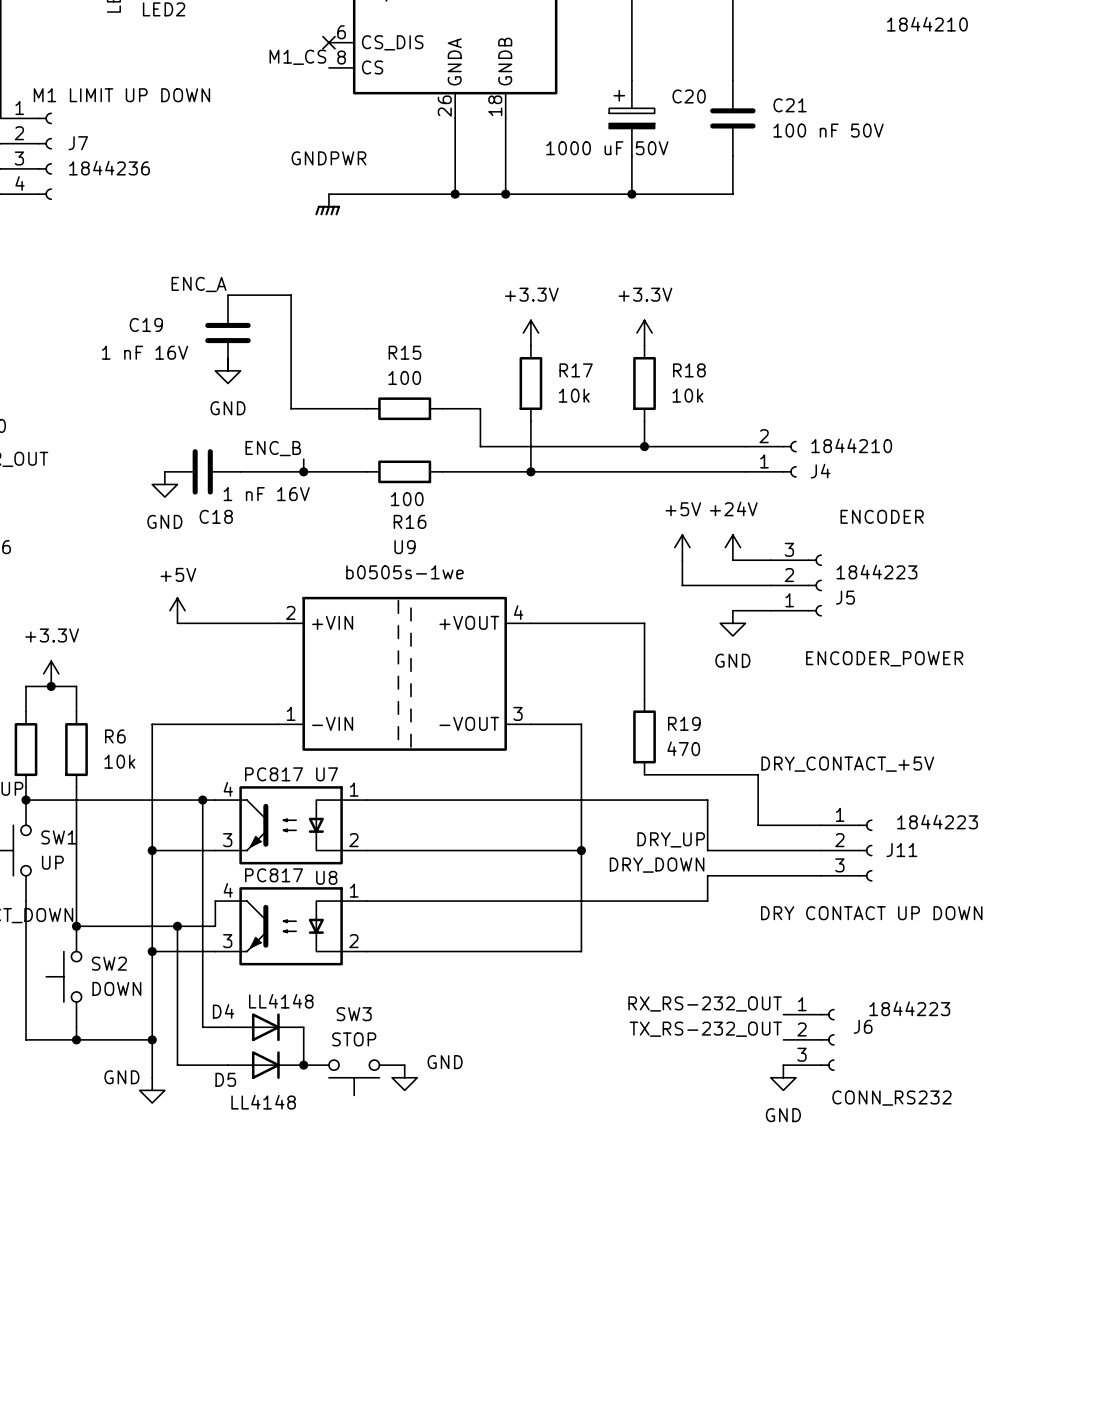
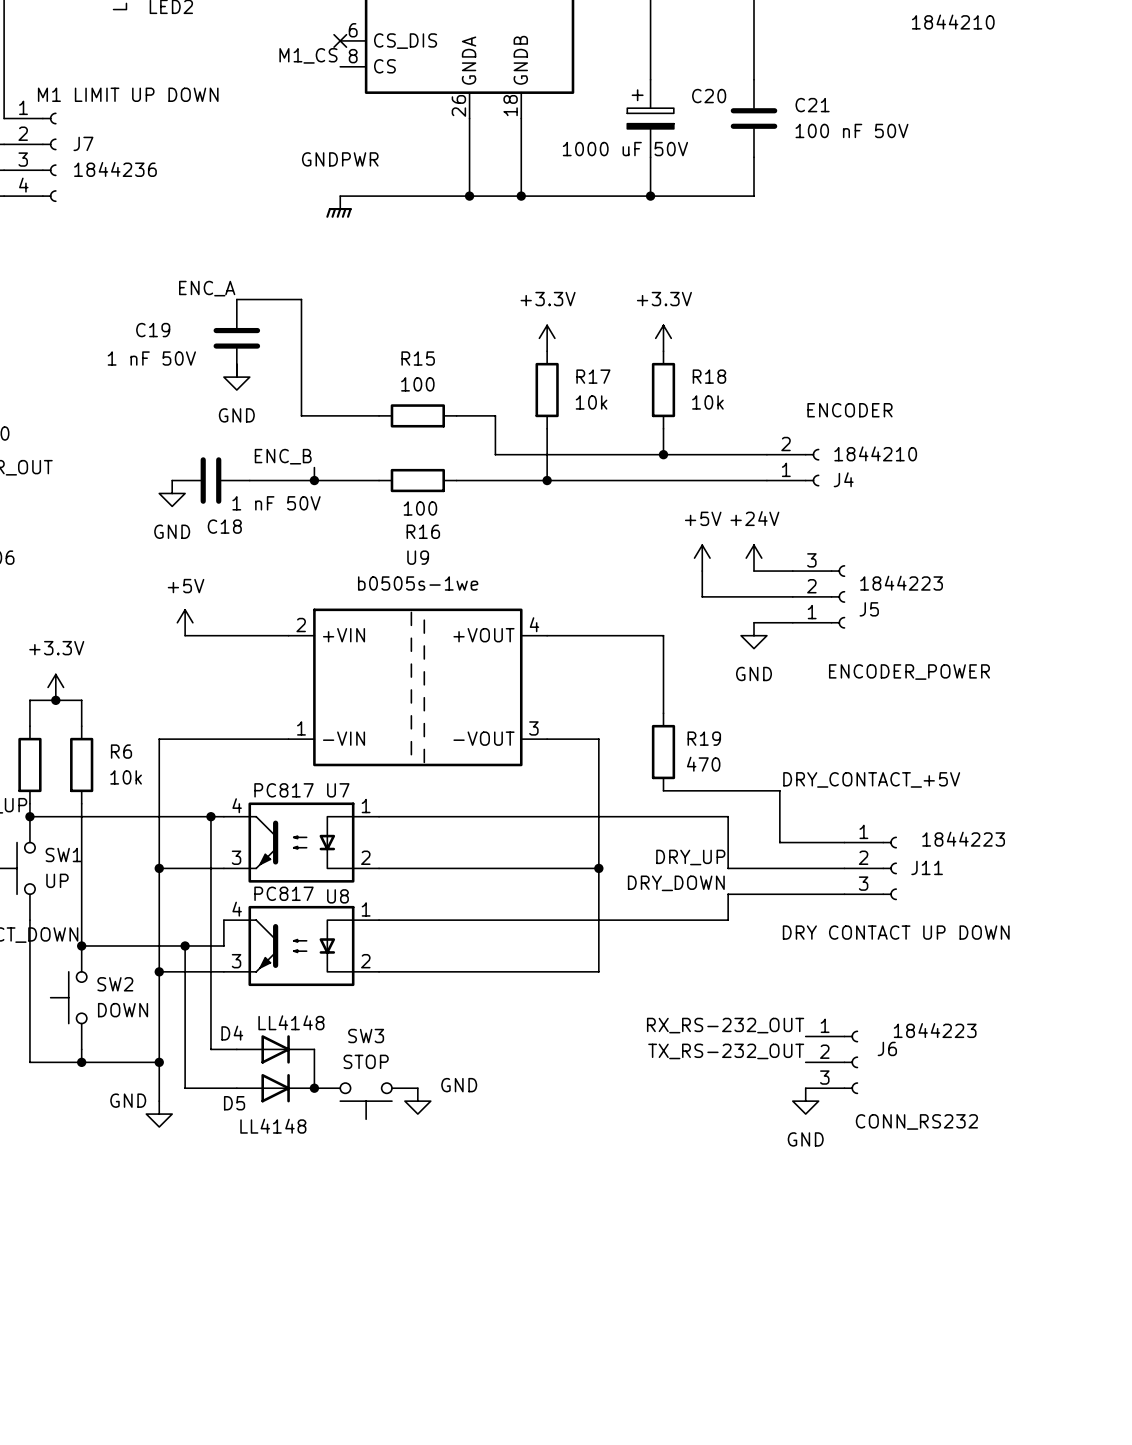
C19 value: 1 nF 16V (145, 352) -> 1 nF 50V (151, 358)
C18 value: 1 nF 16V (266, 494) -> 1 nF 50V (276, 503)
J4 text position: ENCODER (882, 516) -> ENCODER (849, 410)

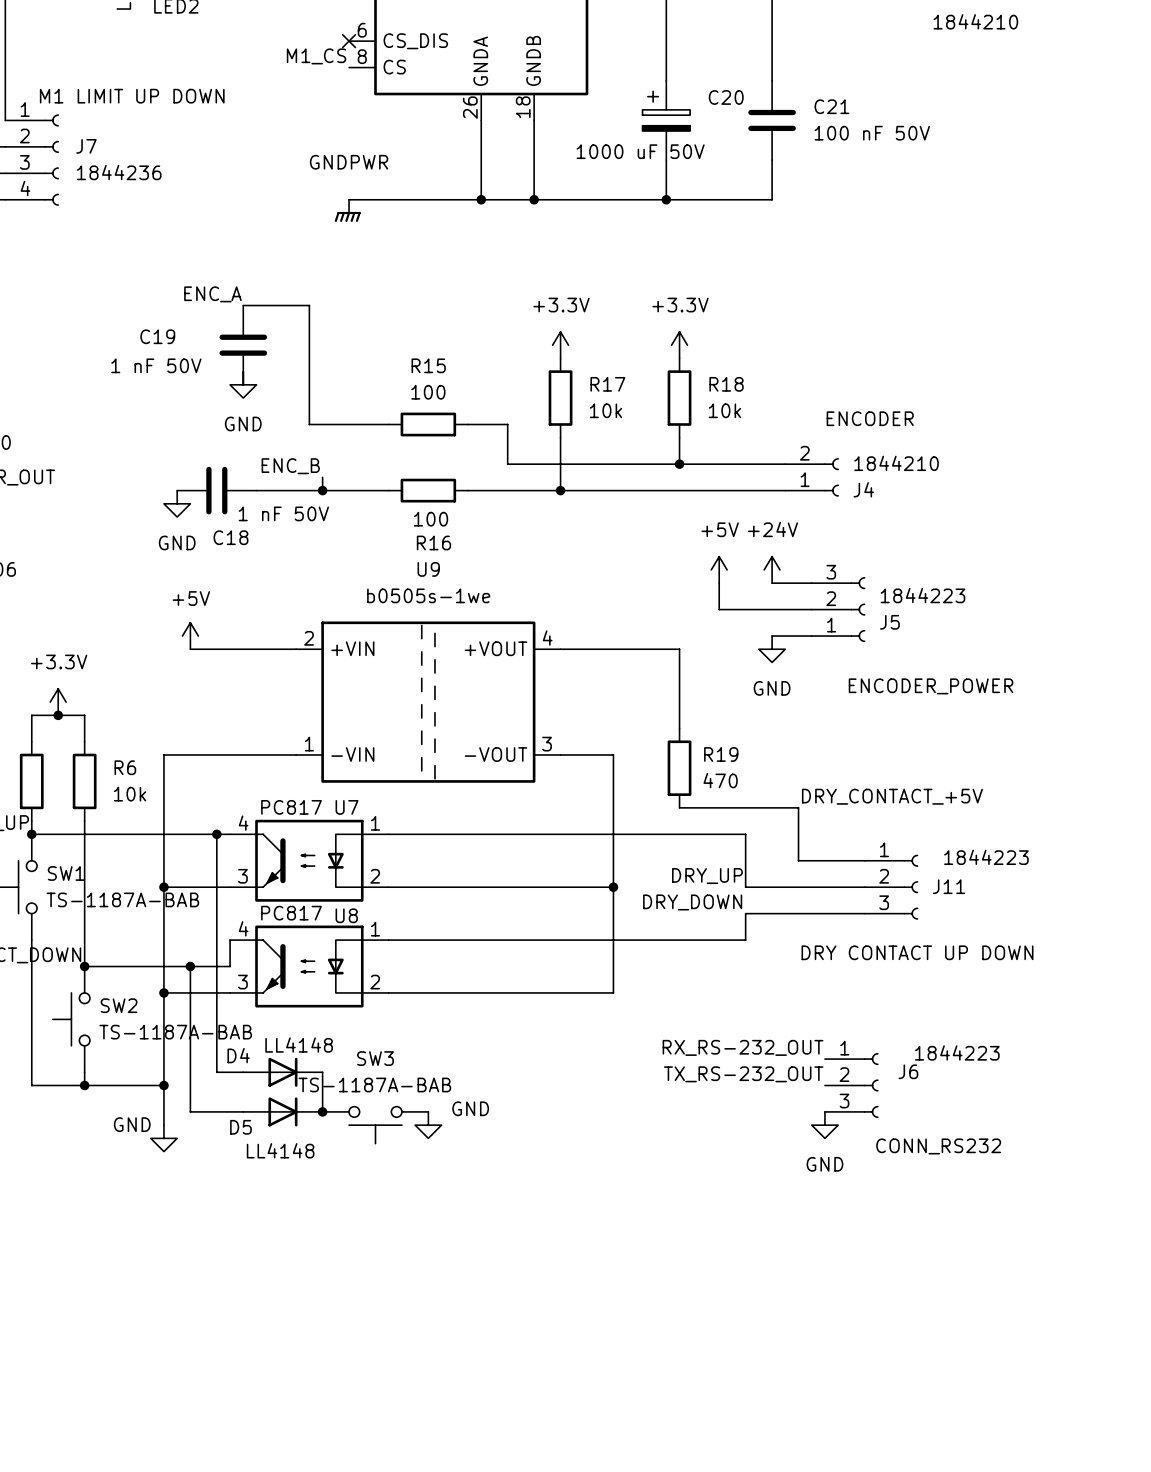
SW1 value: UP (57, 880) -> TS-1187A-BAB (122, 899)
SW2 value: DOWN (123, 1010) -> TS-1187A-BAB (175, 1032)
SW3 value: STOP (366, 1061) -> TS-1187A-BAB (374, 1085)

